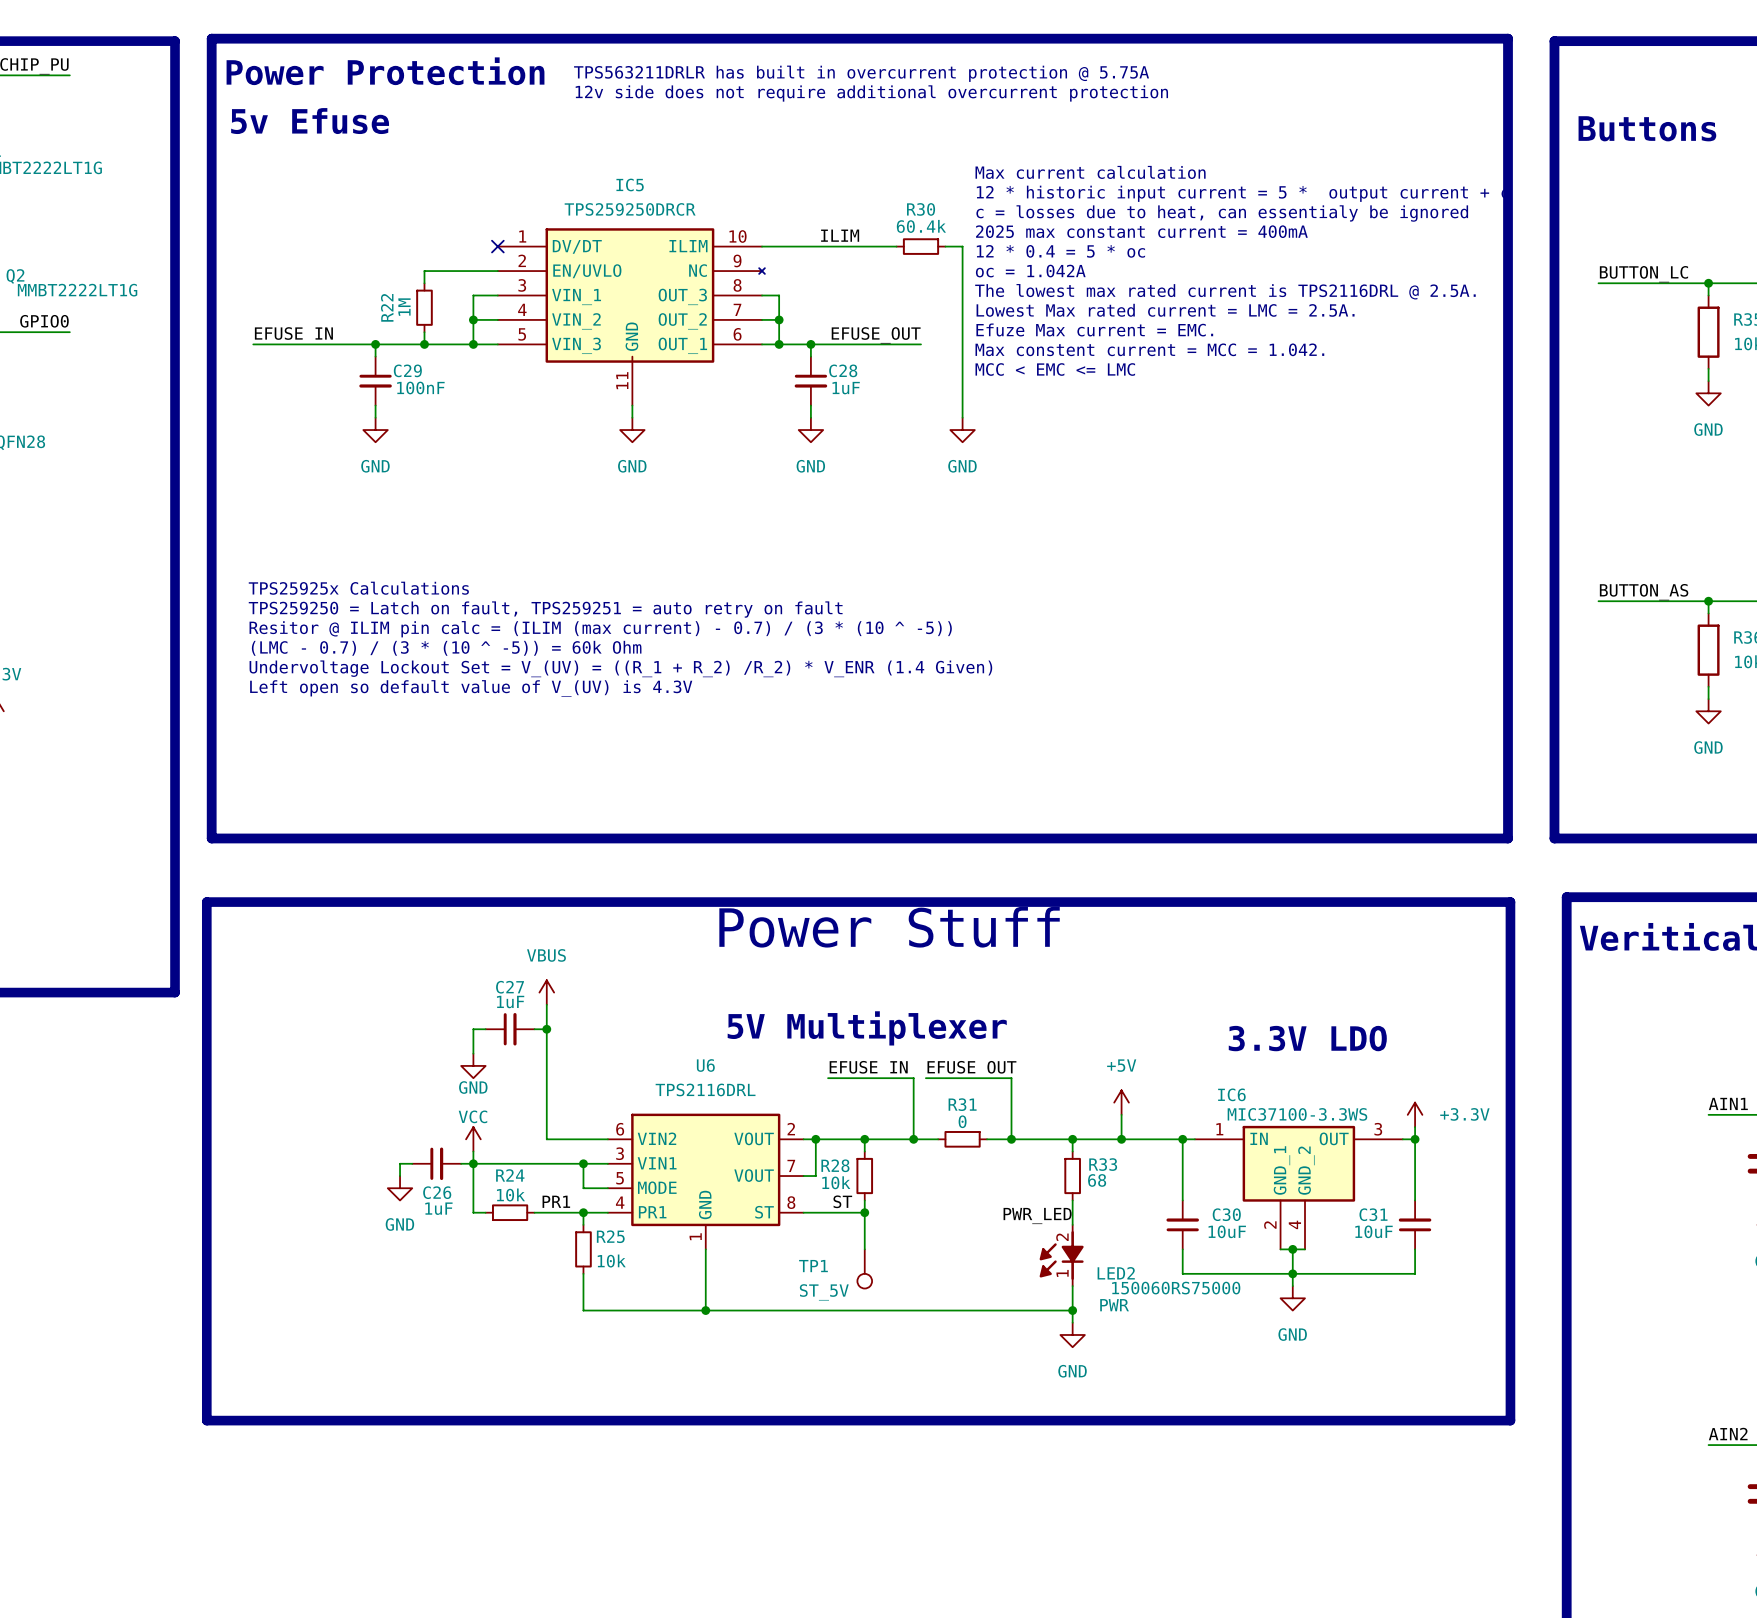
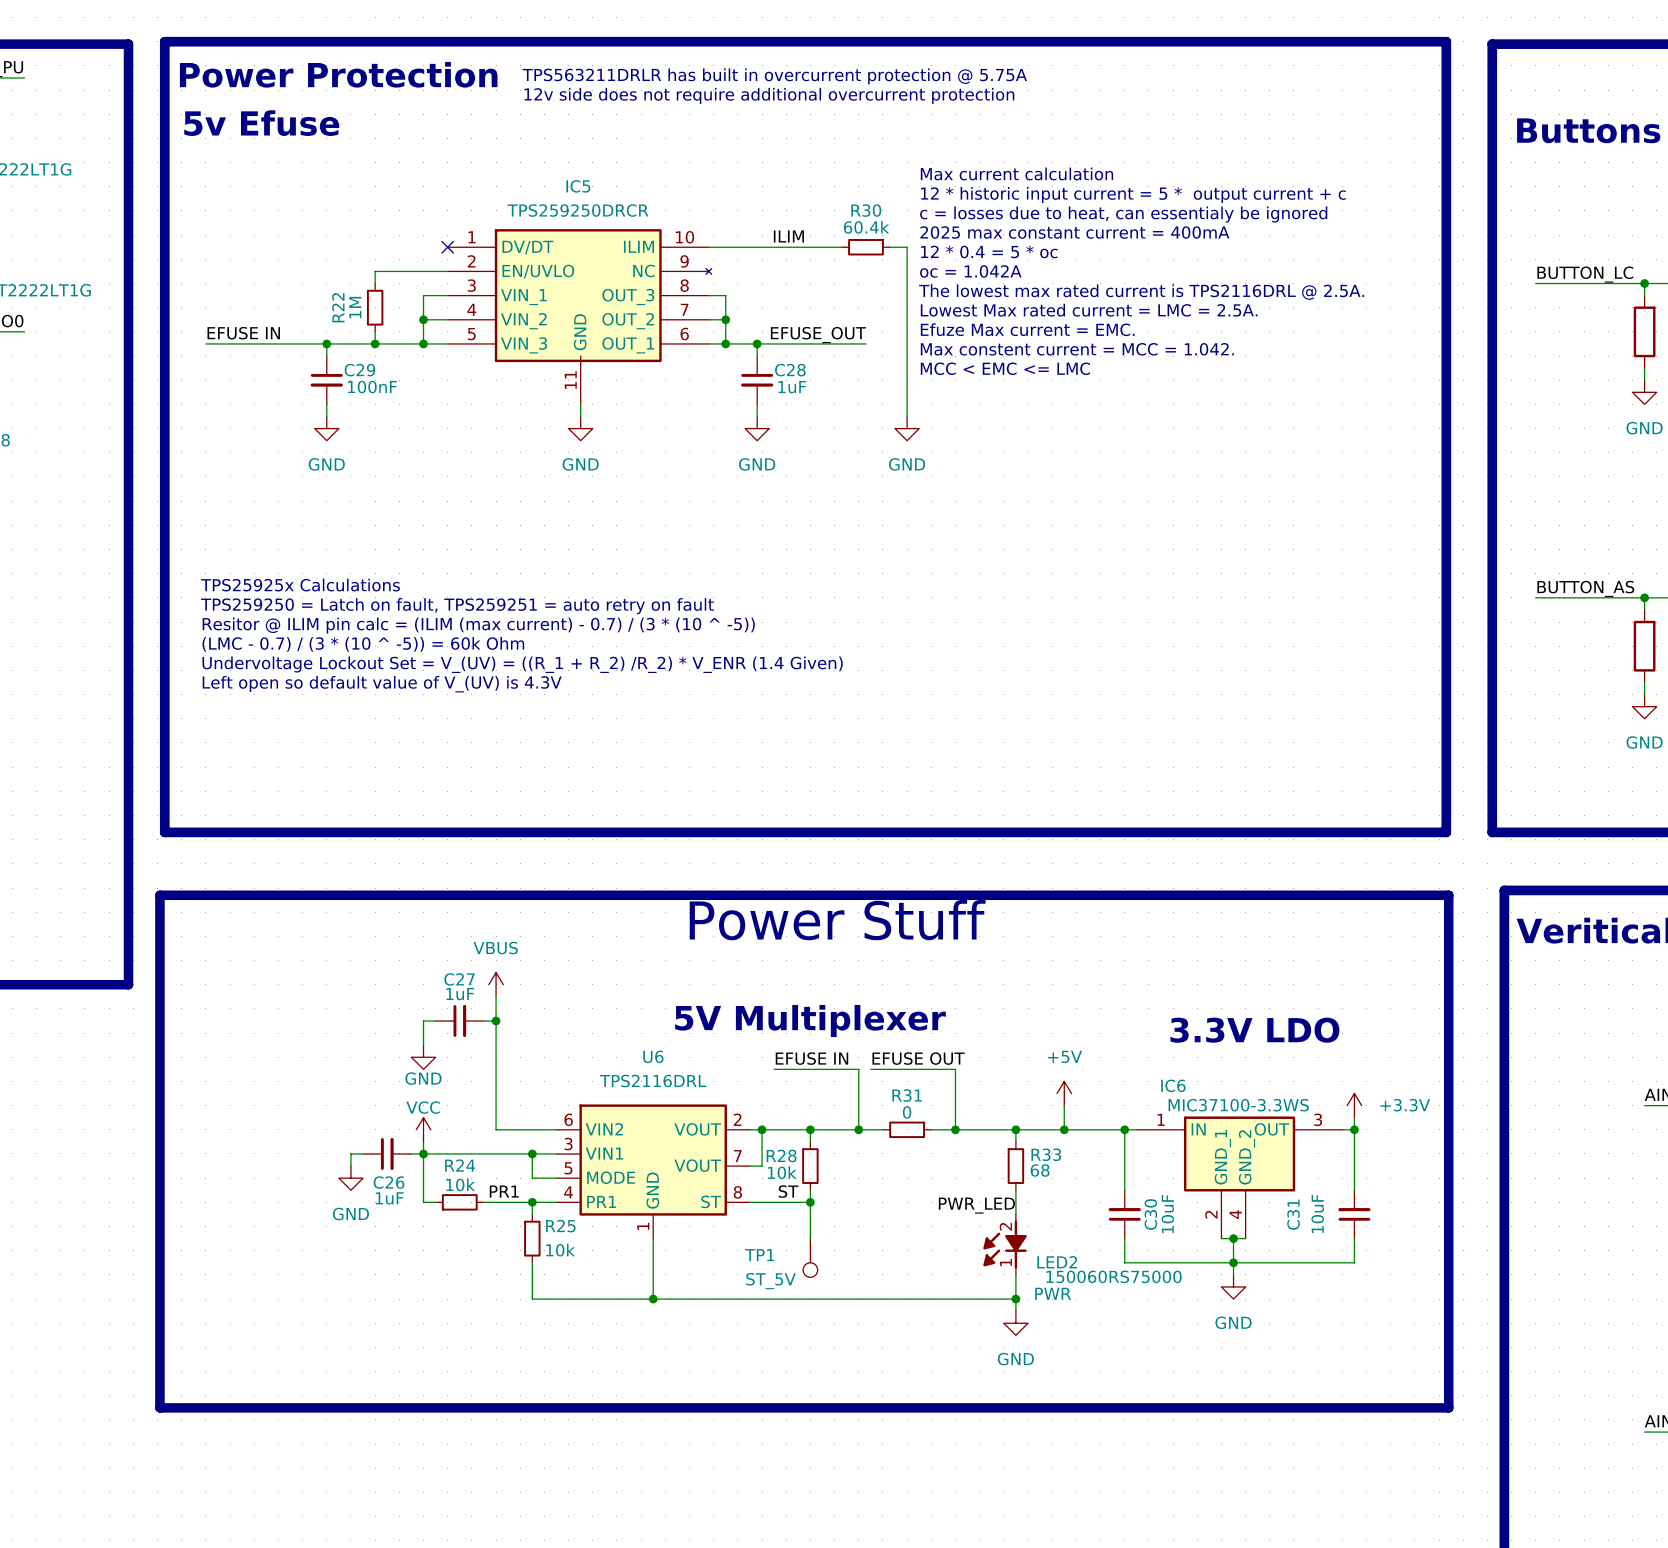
C30 name rotation: 0° (1226, 1214) -> 90° counterclockwise (1150, 1214)
C31 name rotation: 0° (1373, 1214) -> 90° counterclockwise (1293, 1214)
C30 value rotation: 0° (1227, 1231) -> 90° counterclockwise (1167, 1214)
C31 value rotation: 0° (1374, 1231) -> 90° counterclockwise (1317, 1213)

